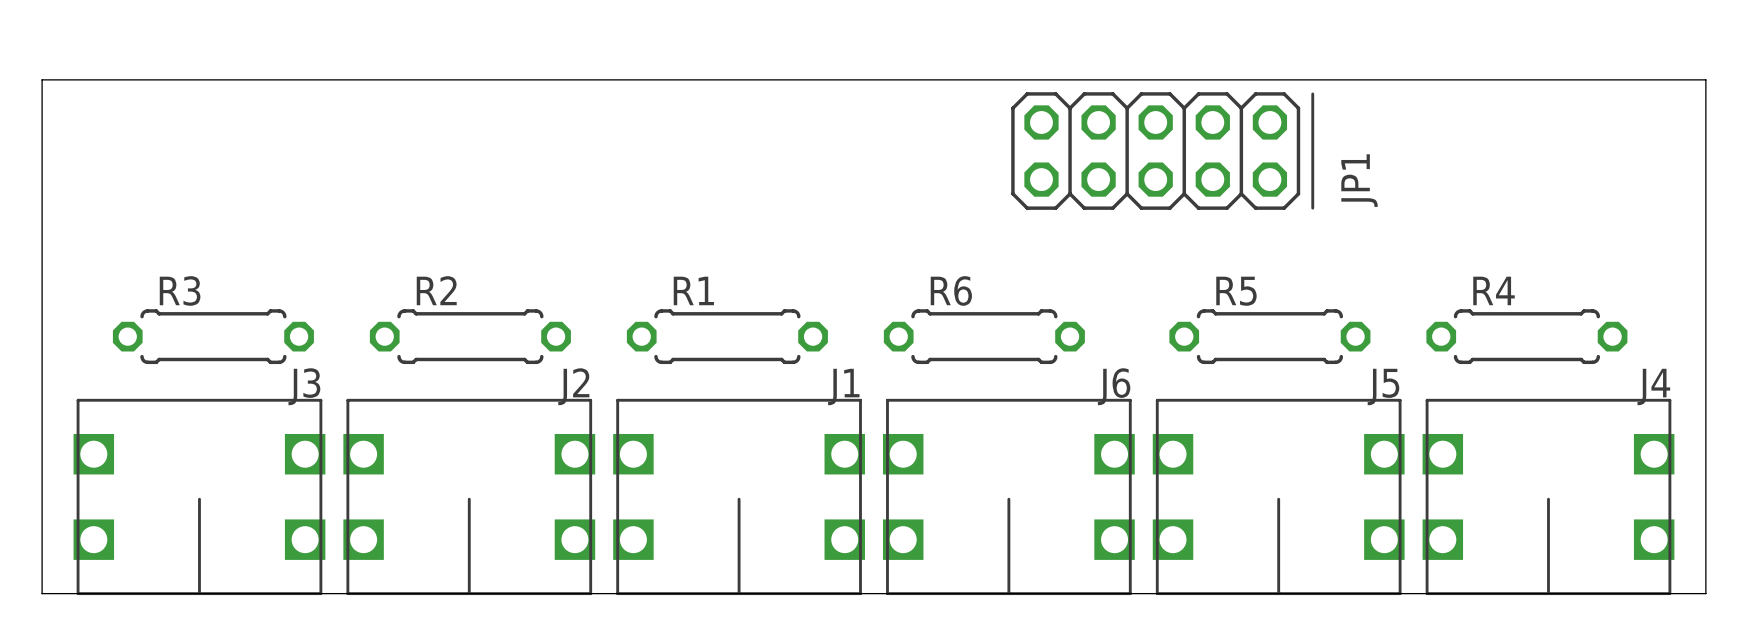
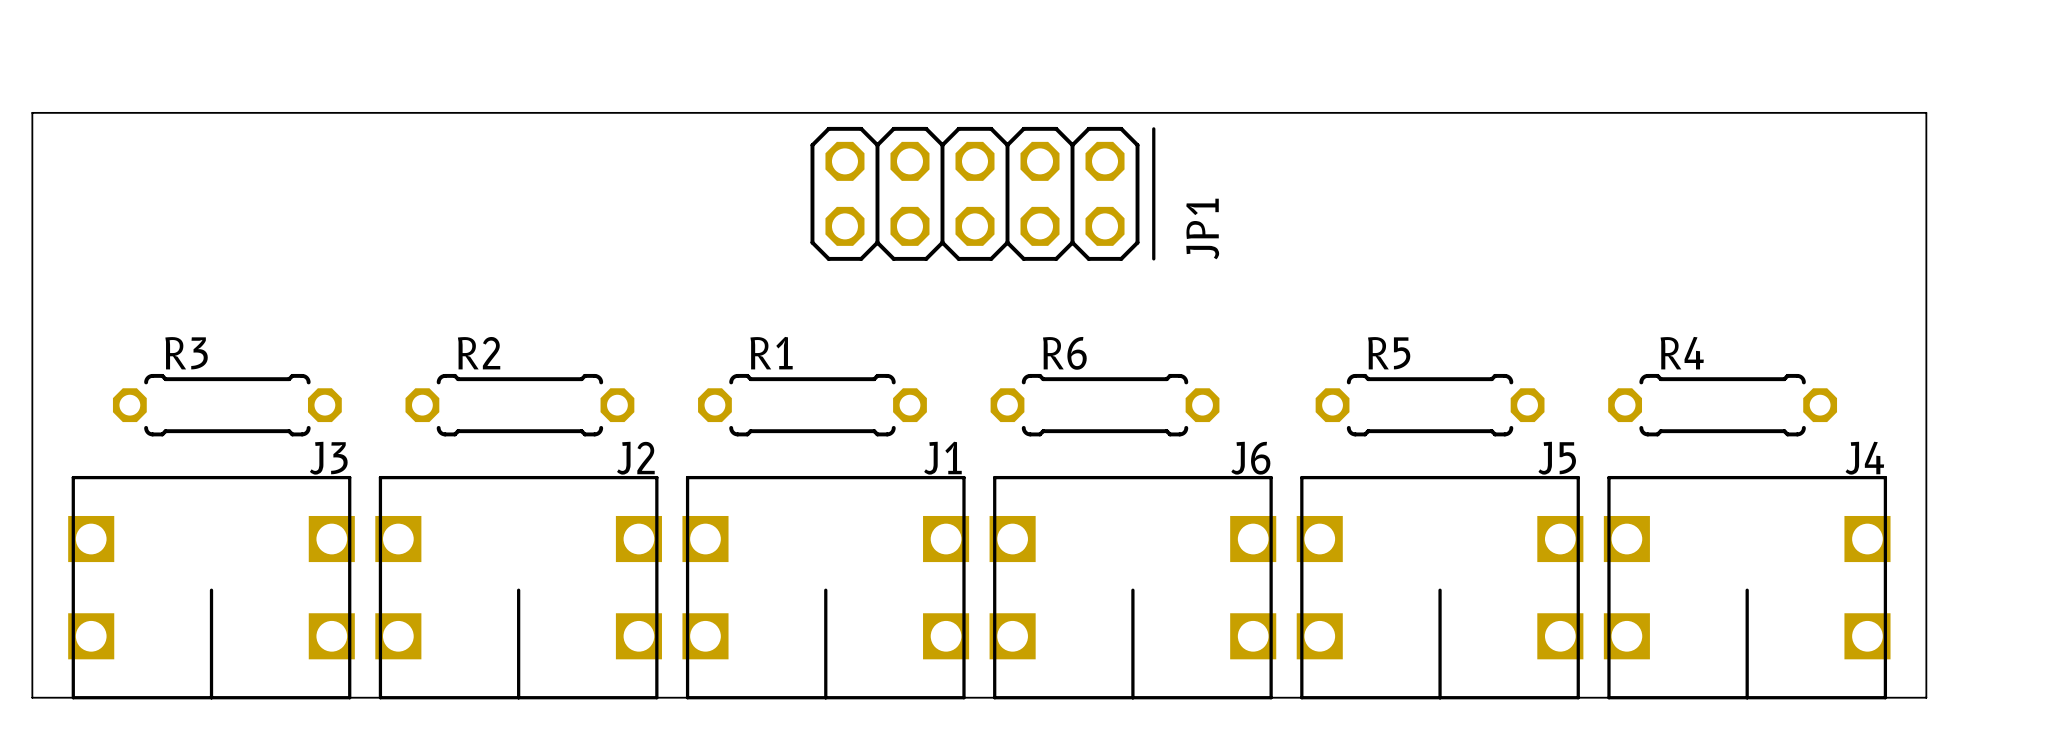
JP1 position: (1162, 151) -> (982, 193)

